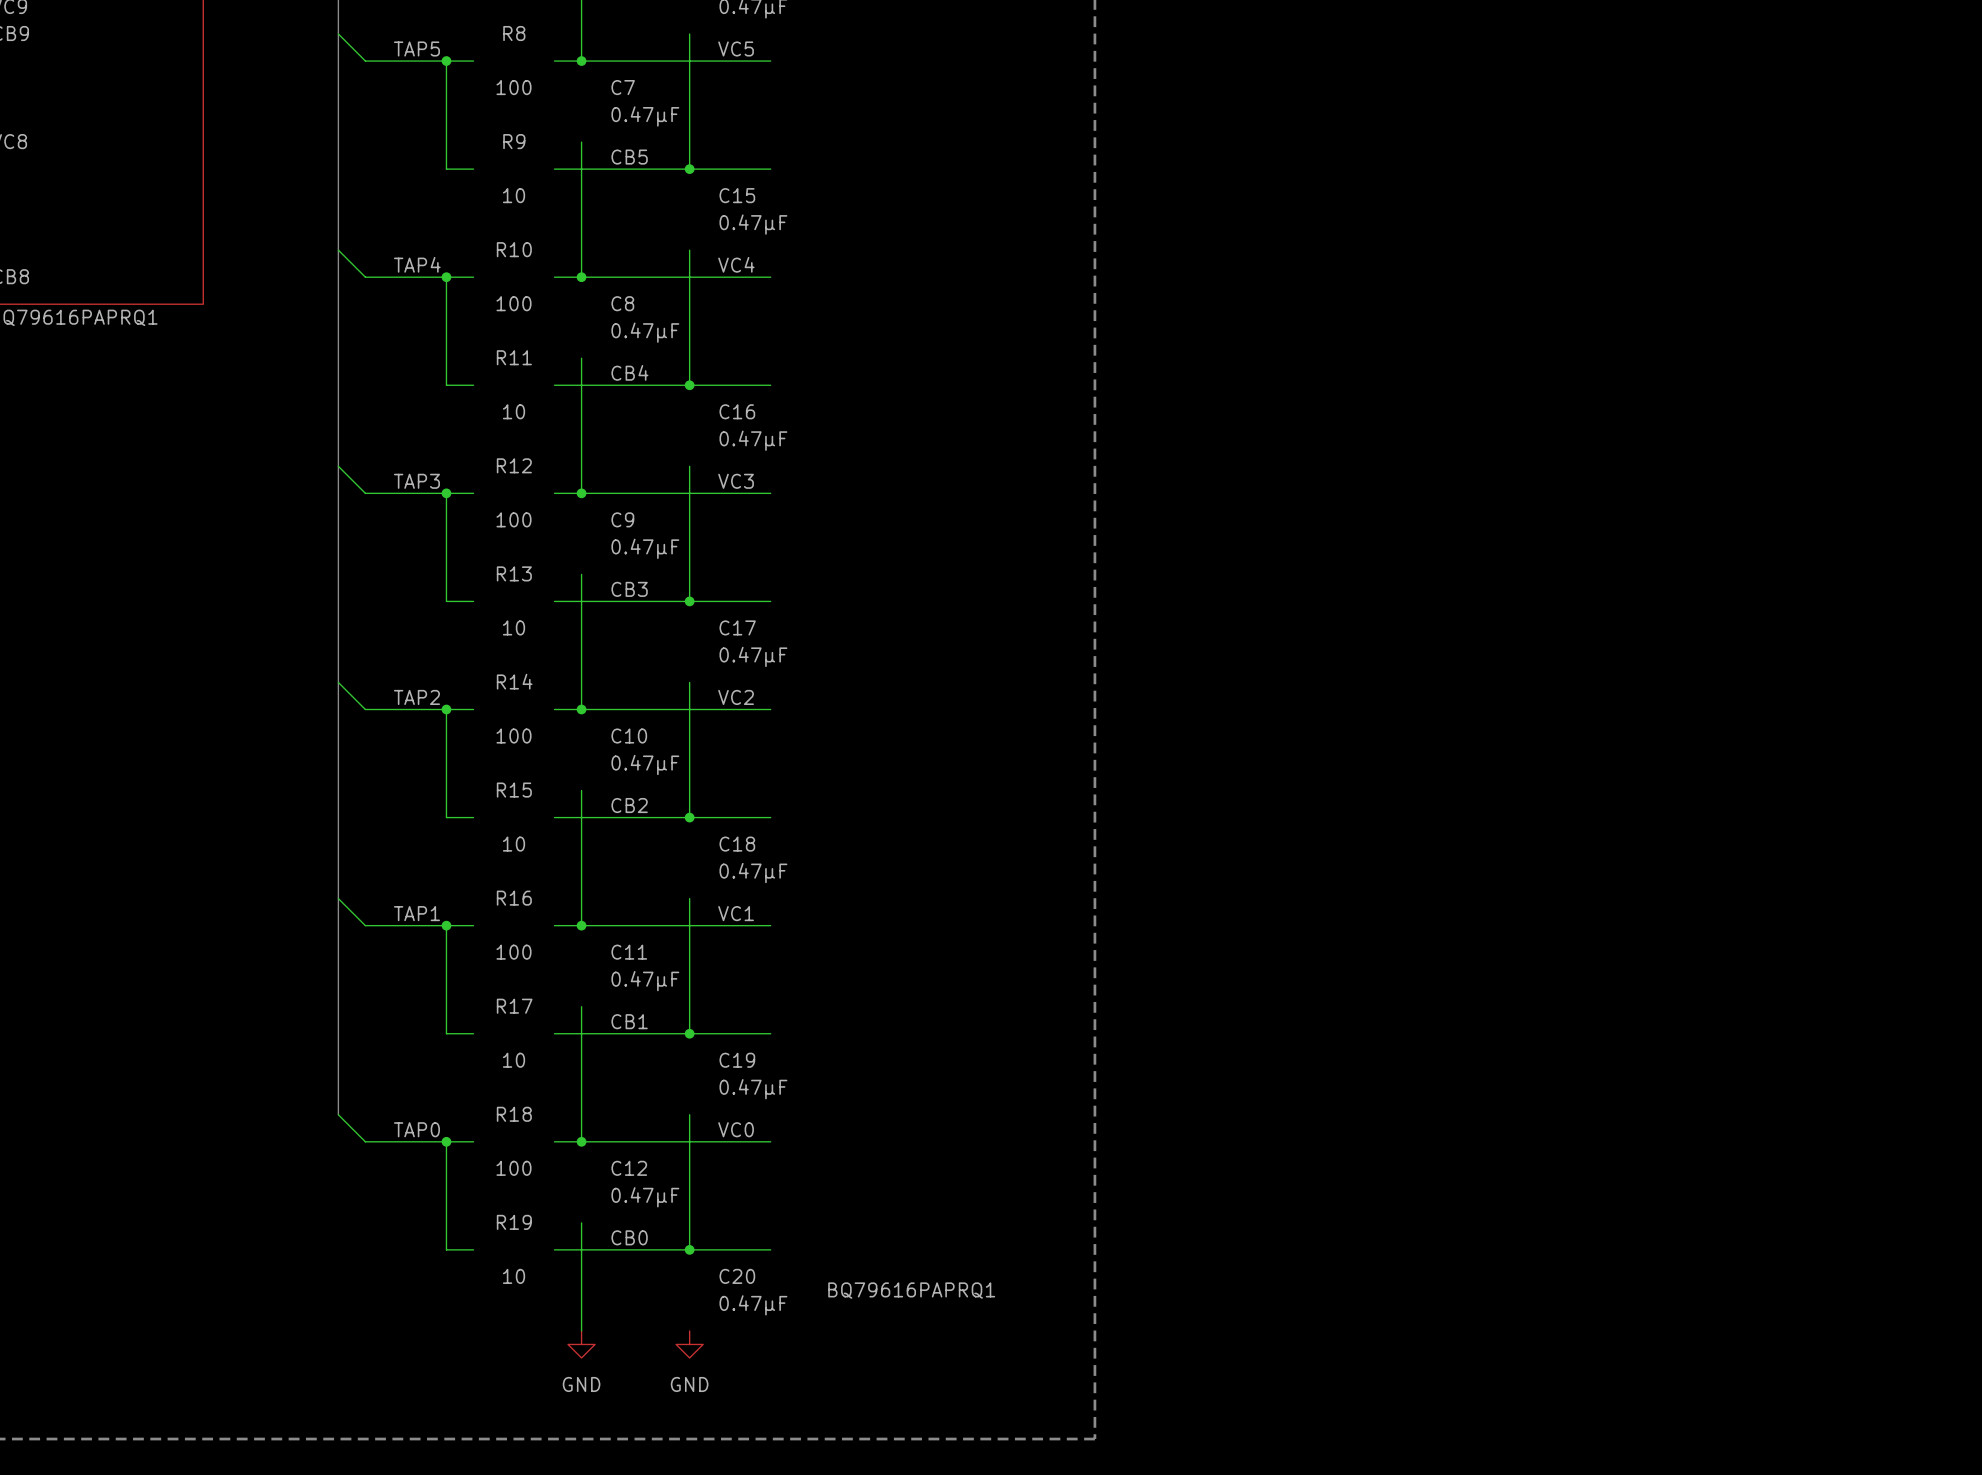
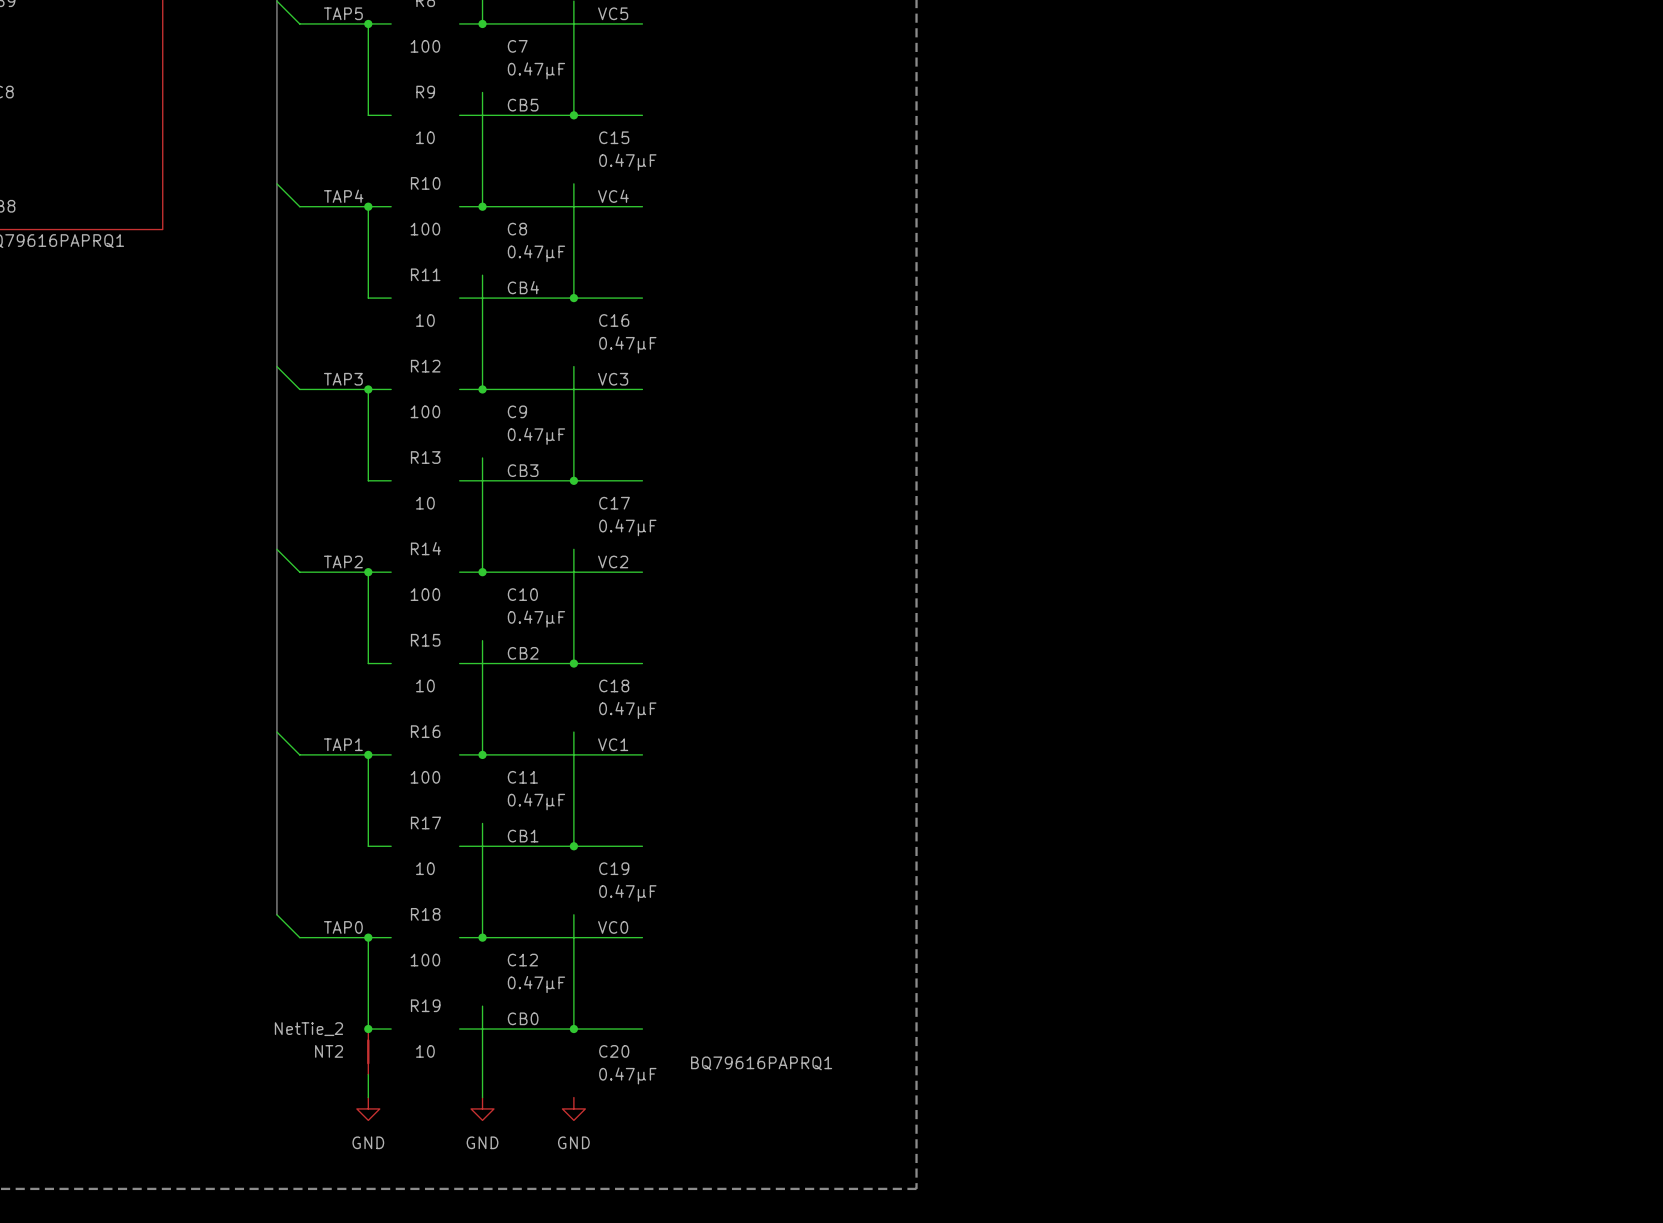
junction: none -> (368, 1029)
NT2: none -> NetTie_2 (368, 1051)
wire: none -> (368, 1074) (368, 1097)
power symbol: none -> GND (368, 1108)

